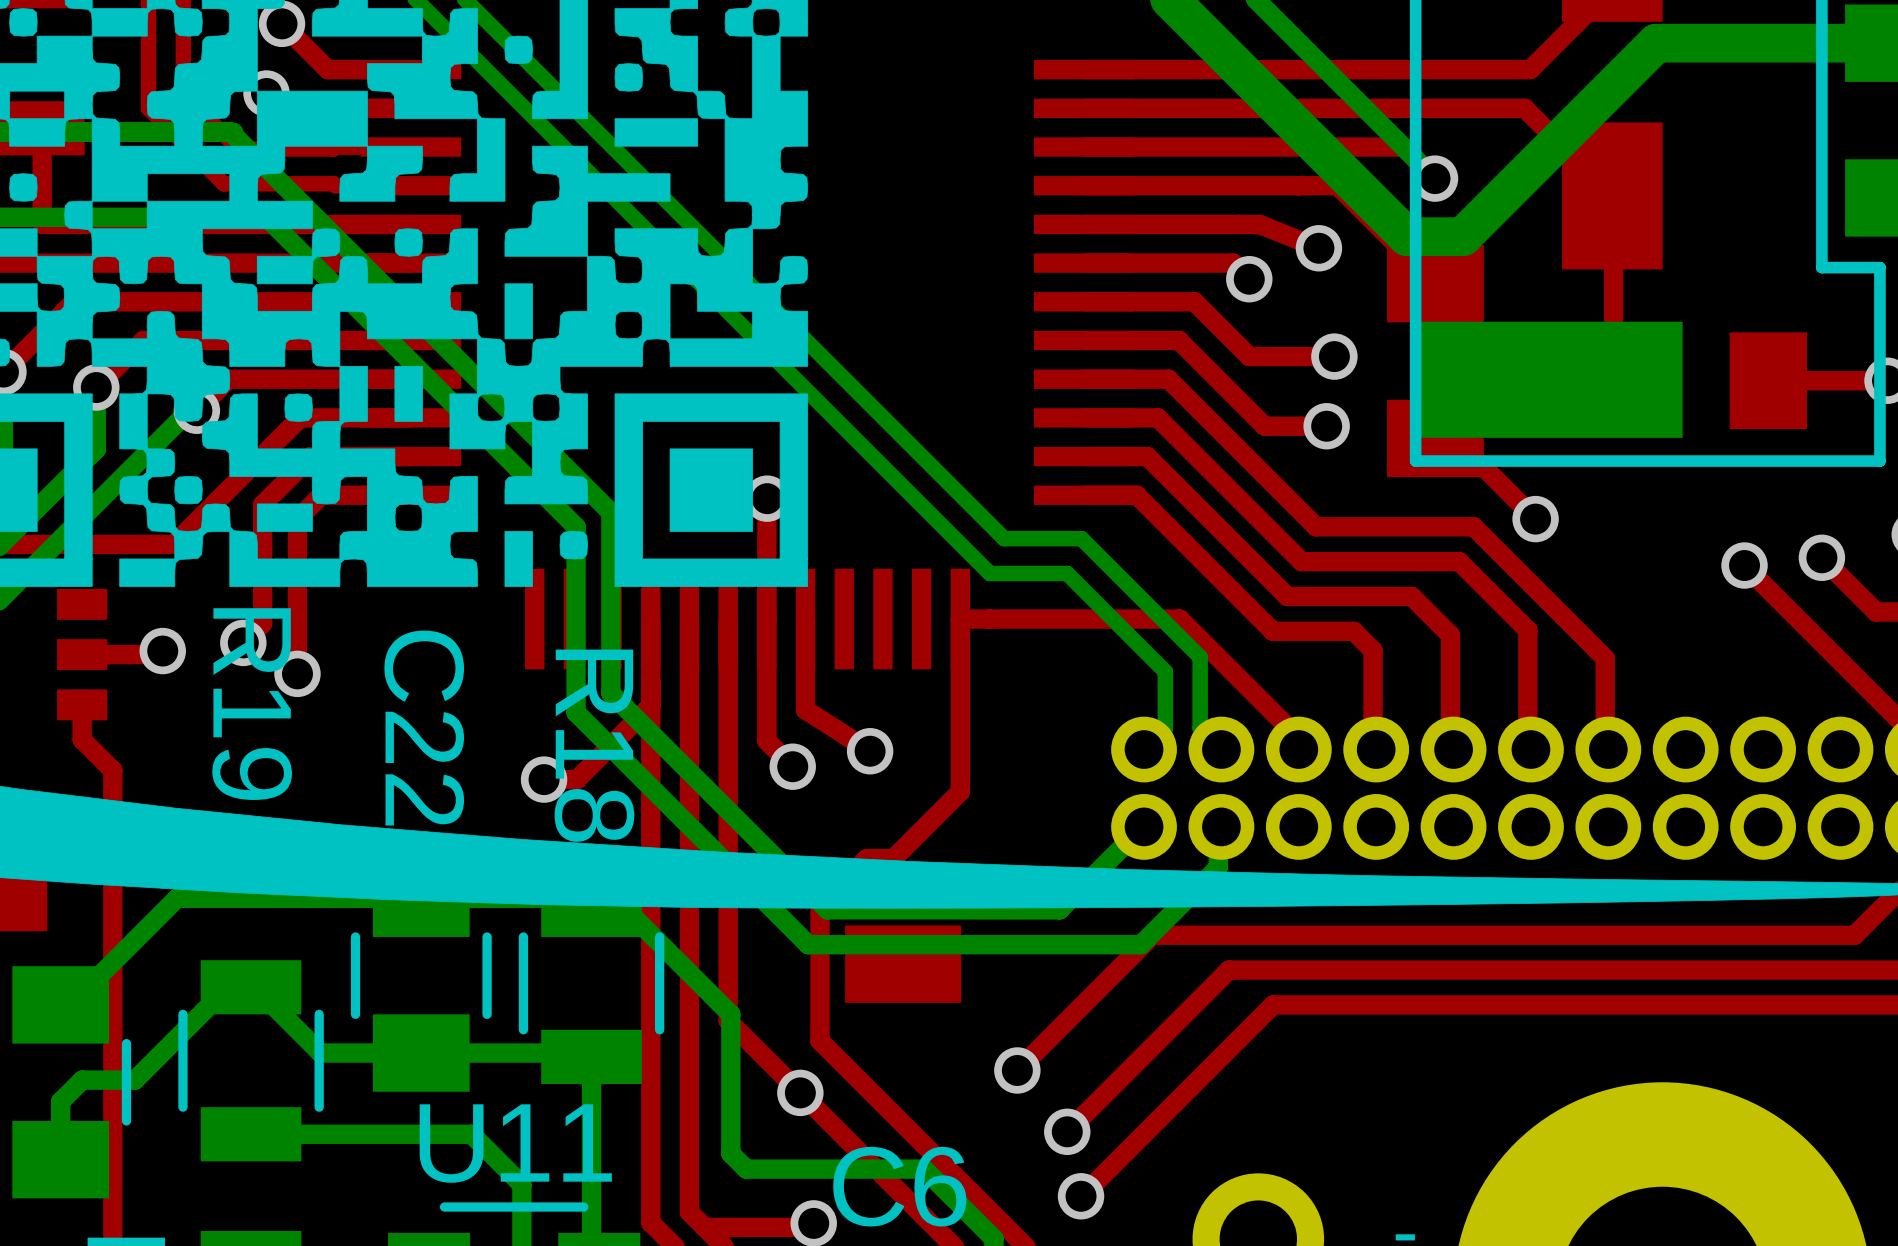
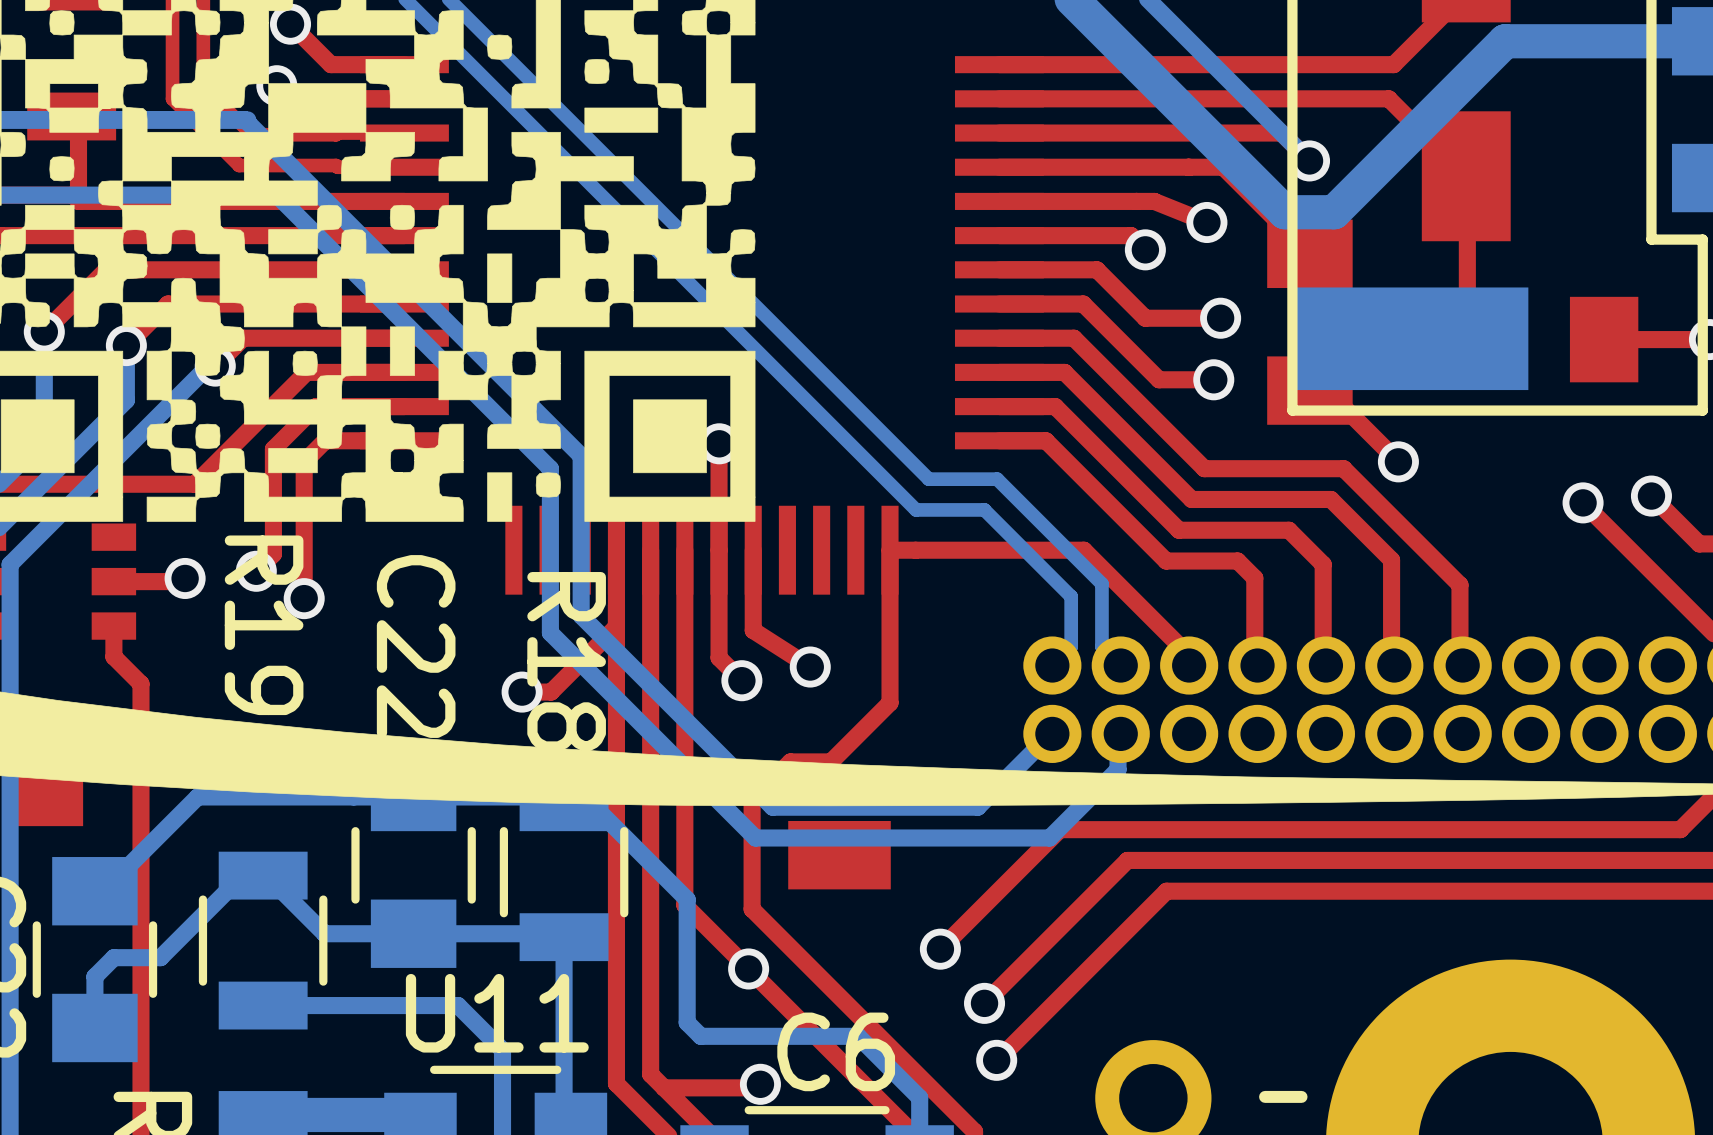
top track: (866, 858) (820, 905) (820, 1040) -> (807, 761) (790, 761) (752, 800) (752, 909) (765, 923)

